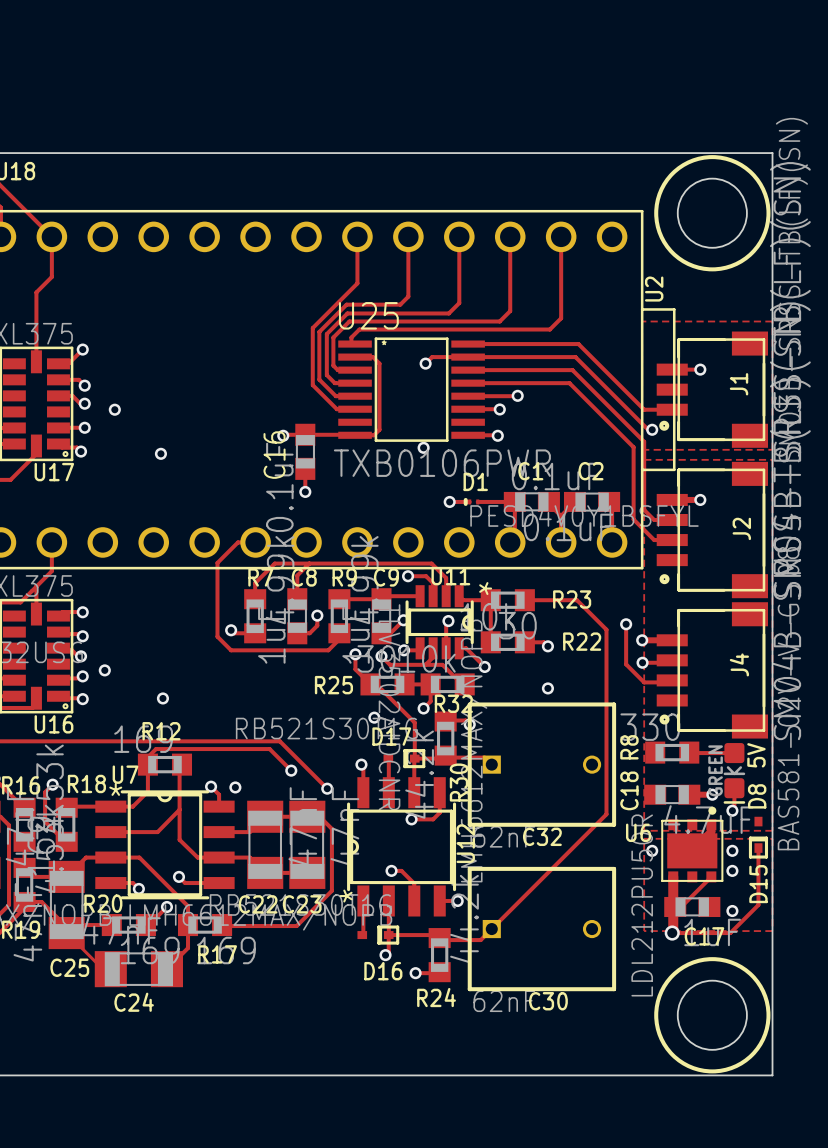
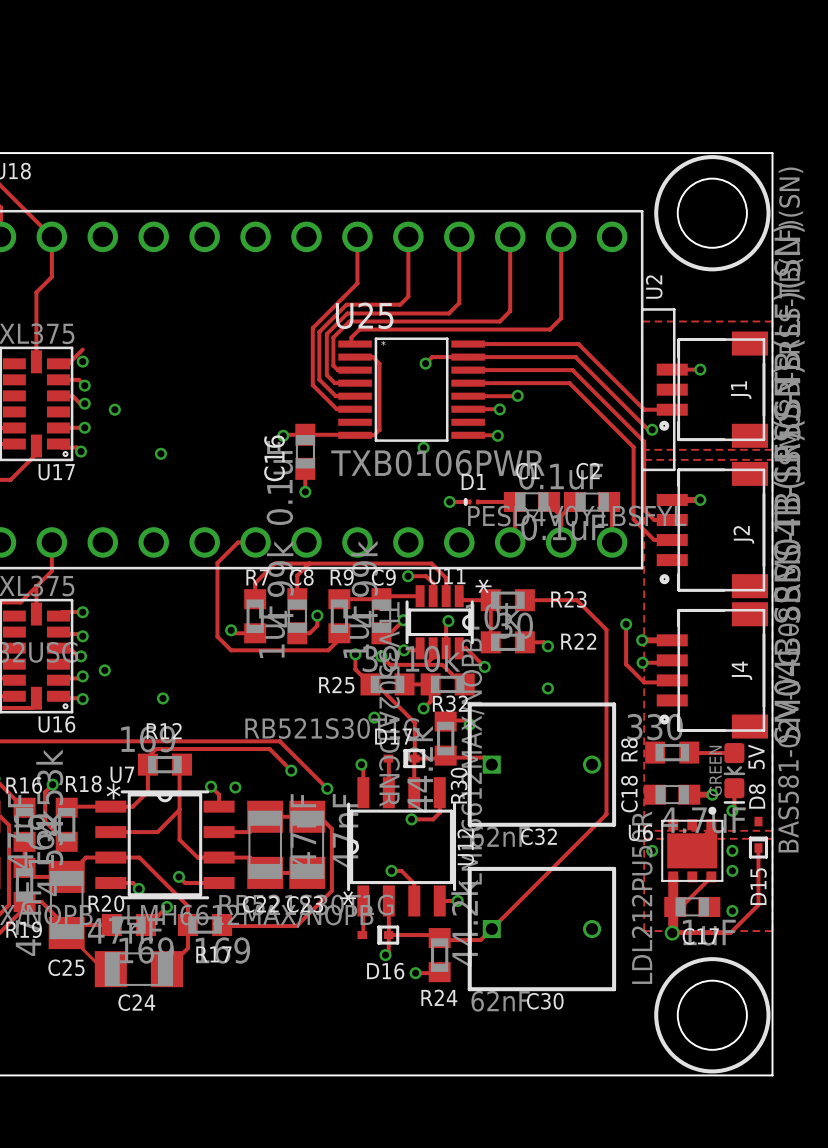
via position: (82, 349) -> (82, 361)

